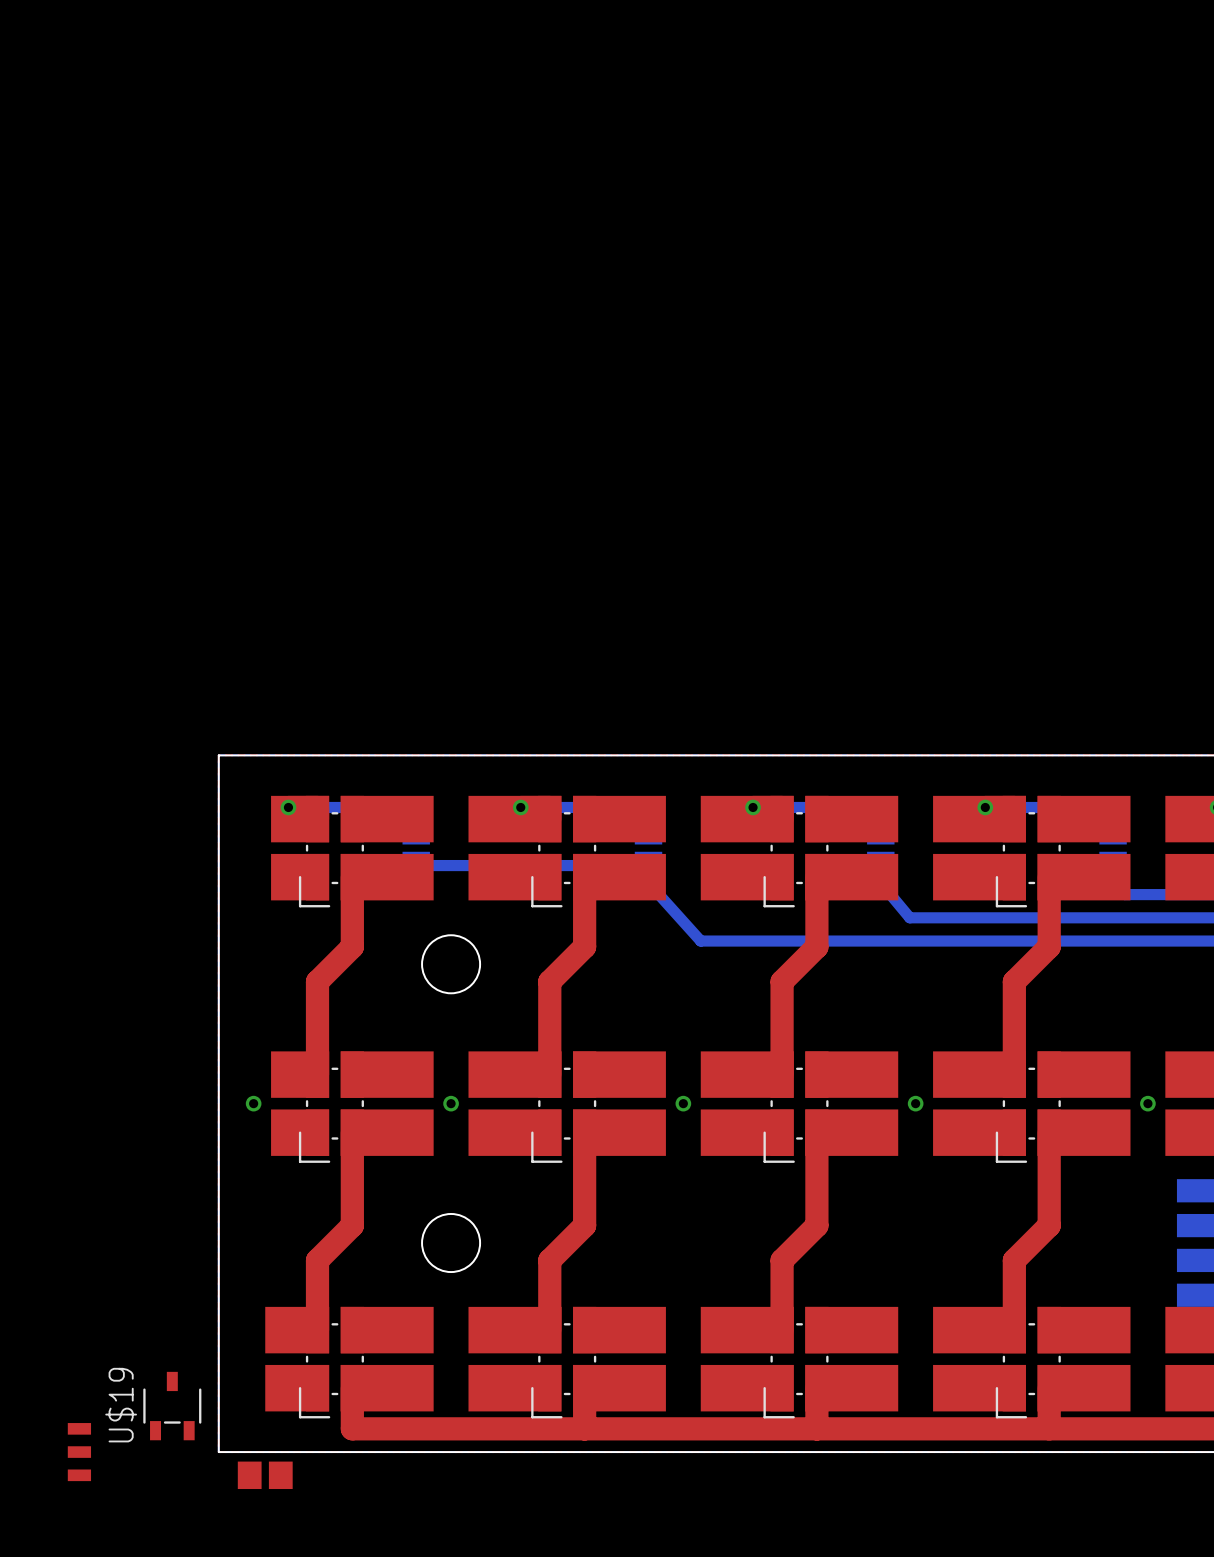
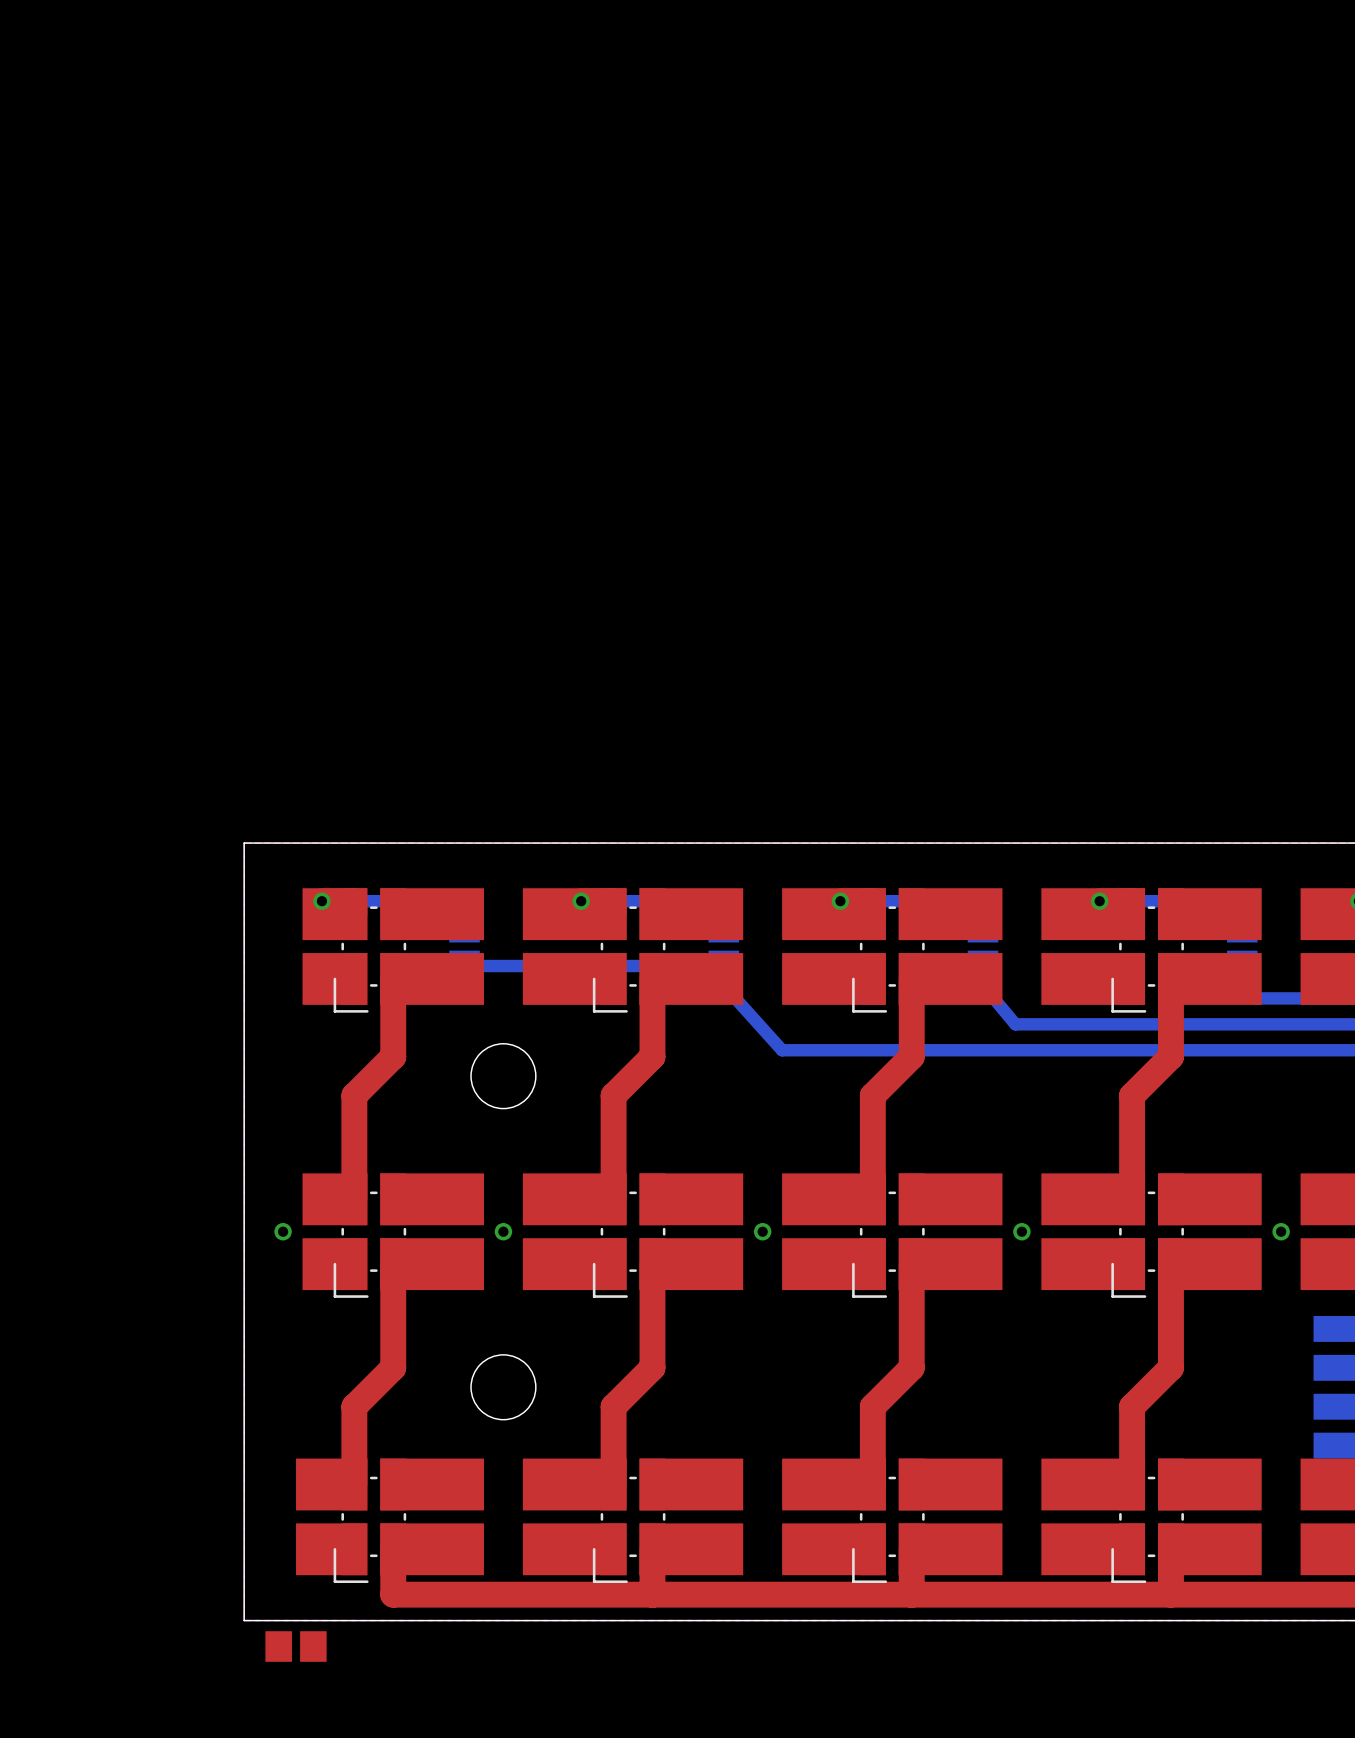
U$19: (172, 1406) -> none
part: (79, 1452) -> none

